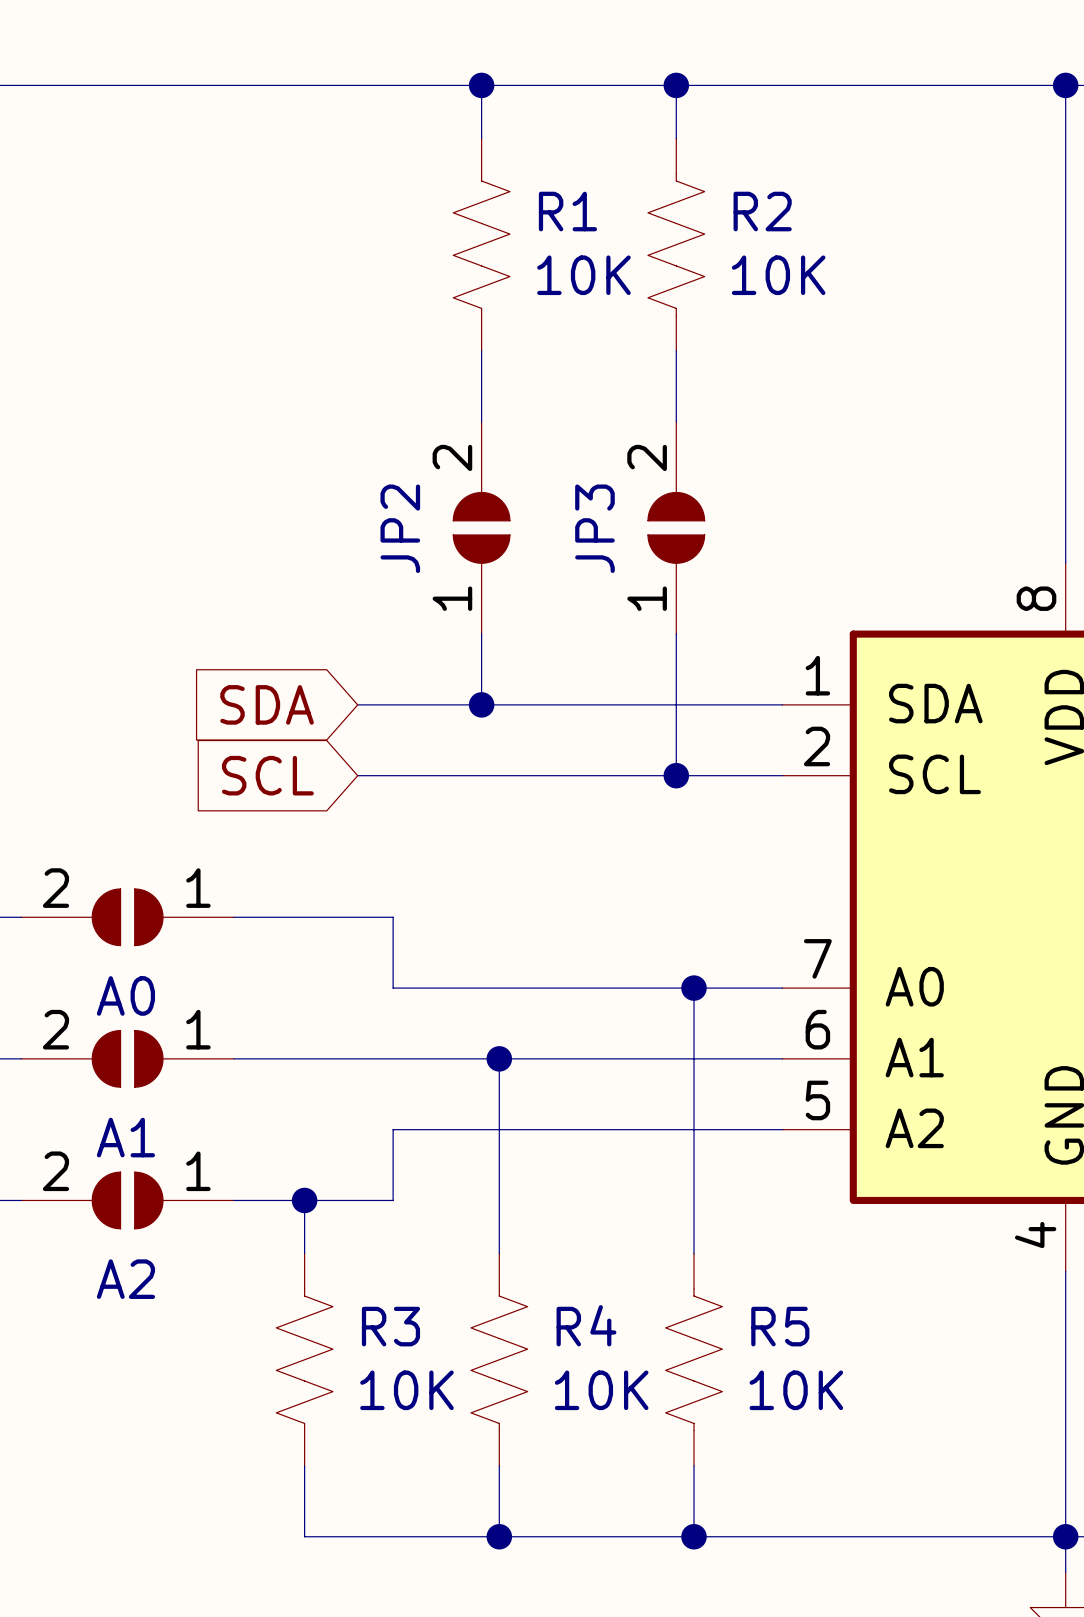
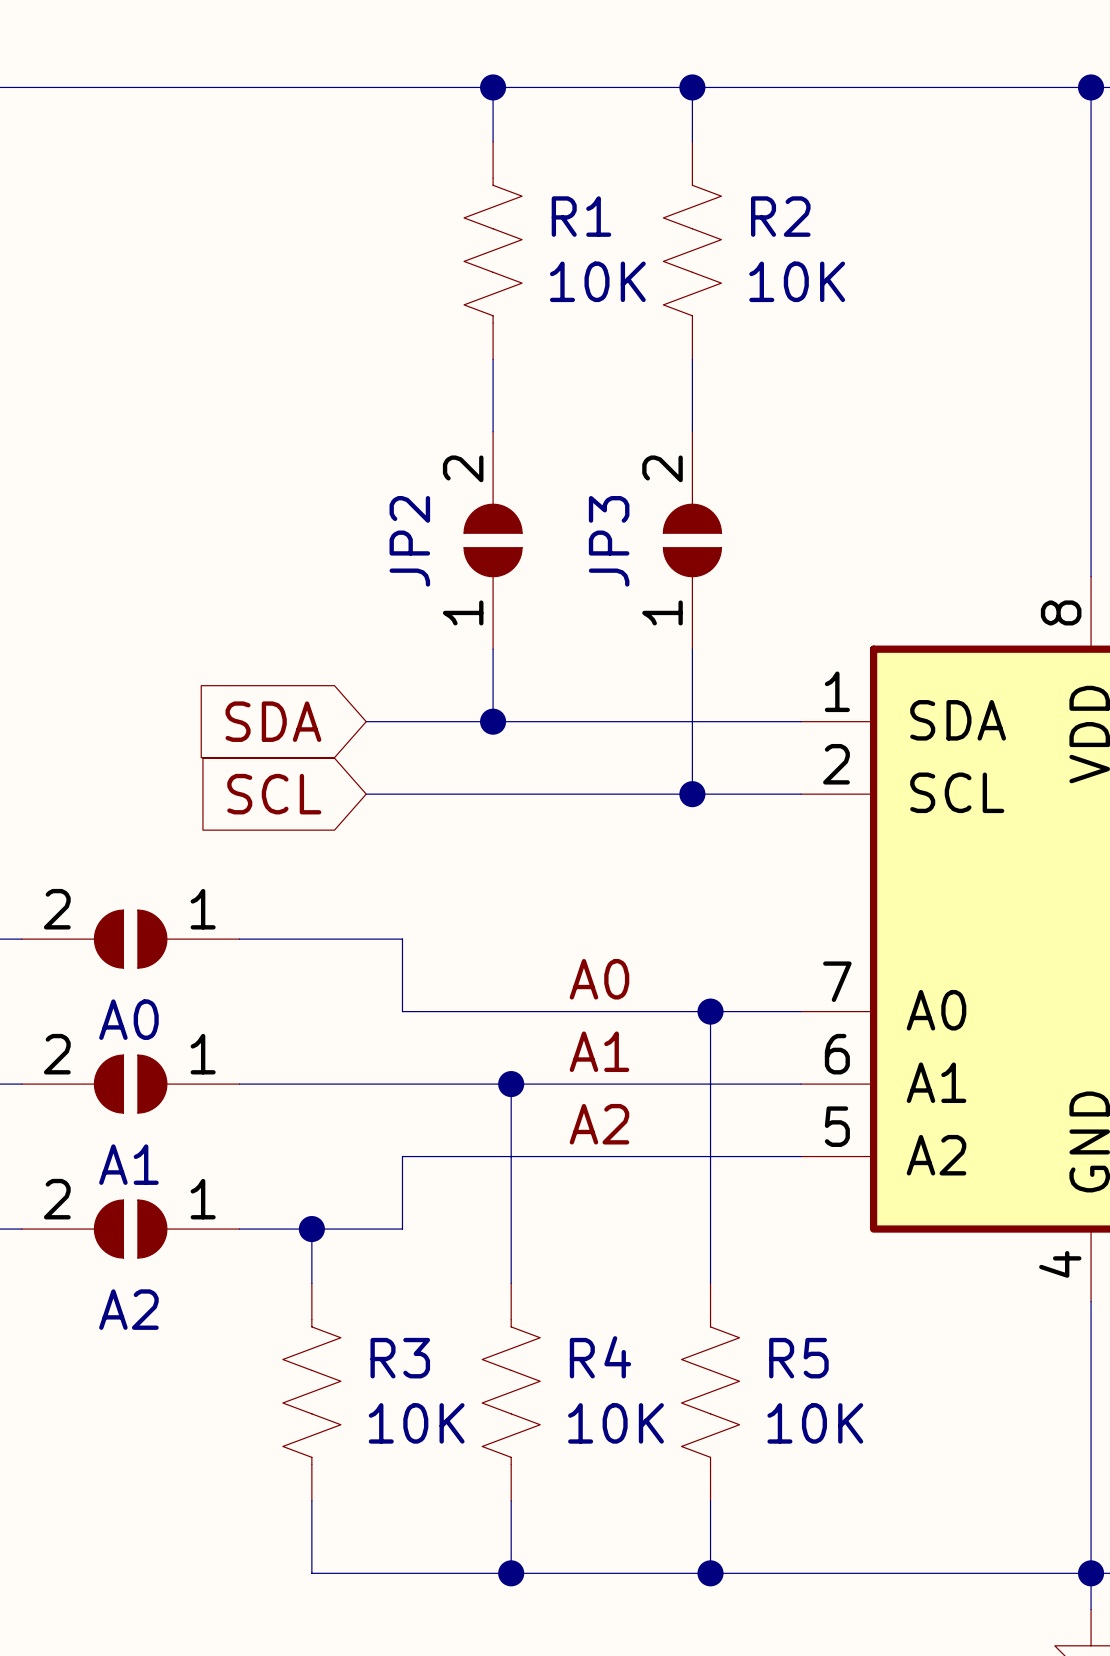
label: none -> A0 (599, 979)
label: none -> A1 (599, 1051)
label: none -> A2 (599, 1124)

